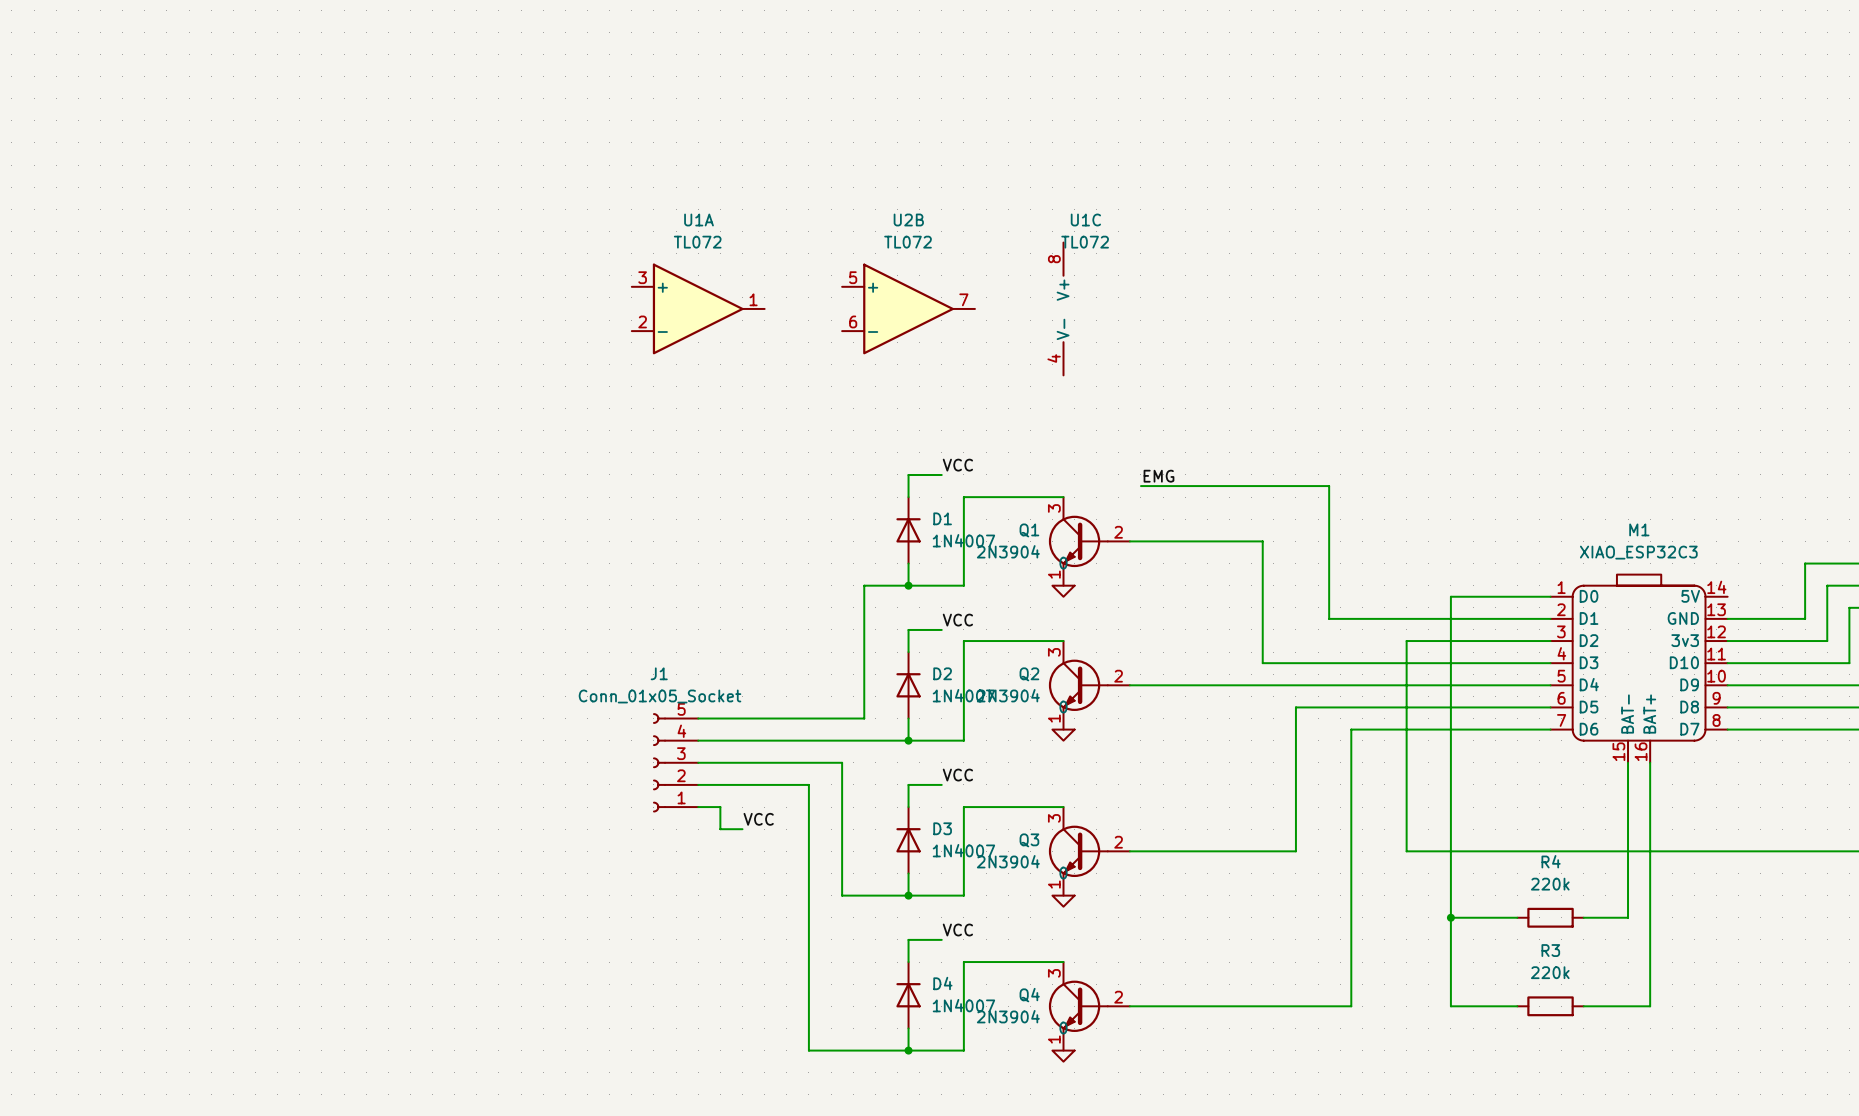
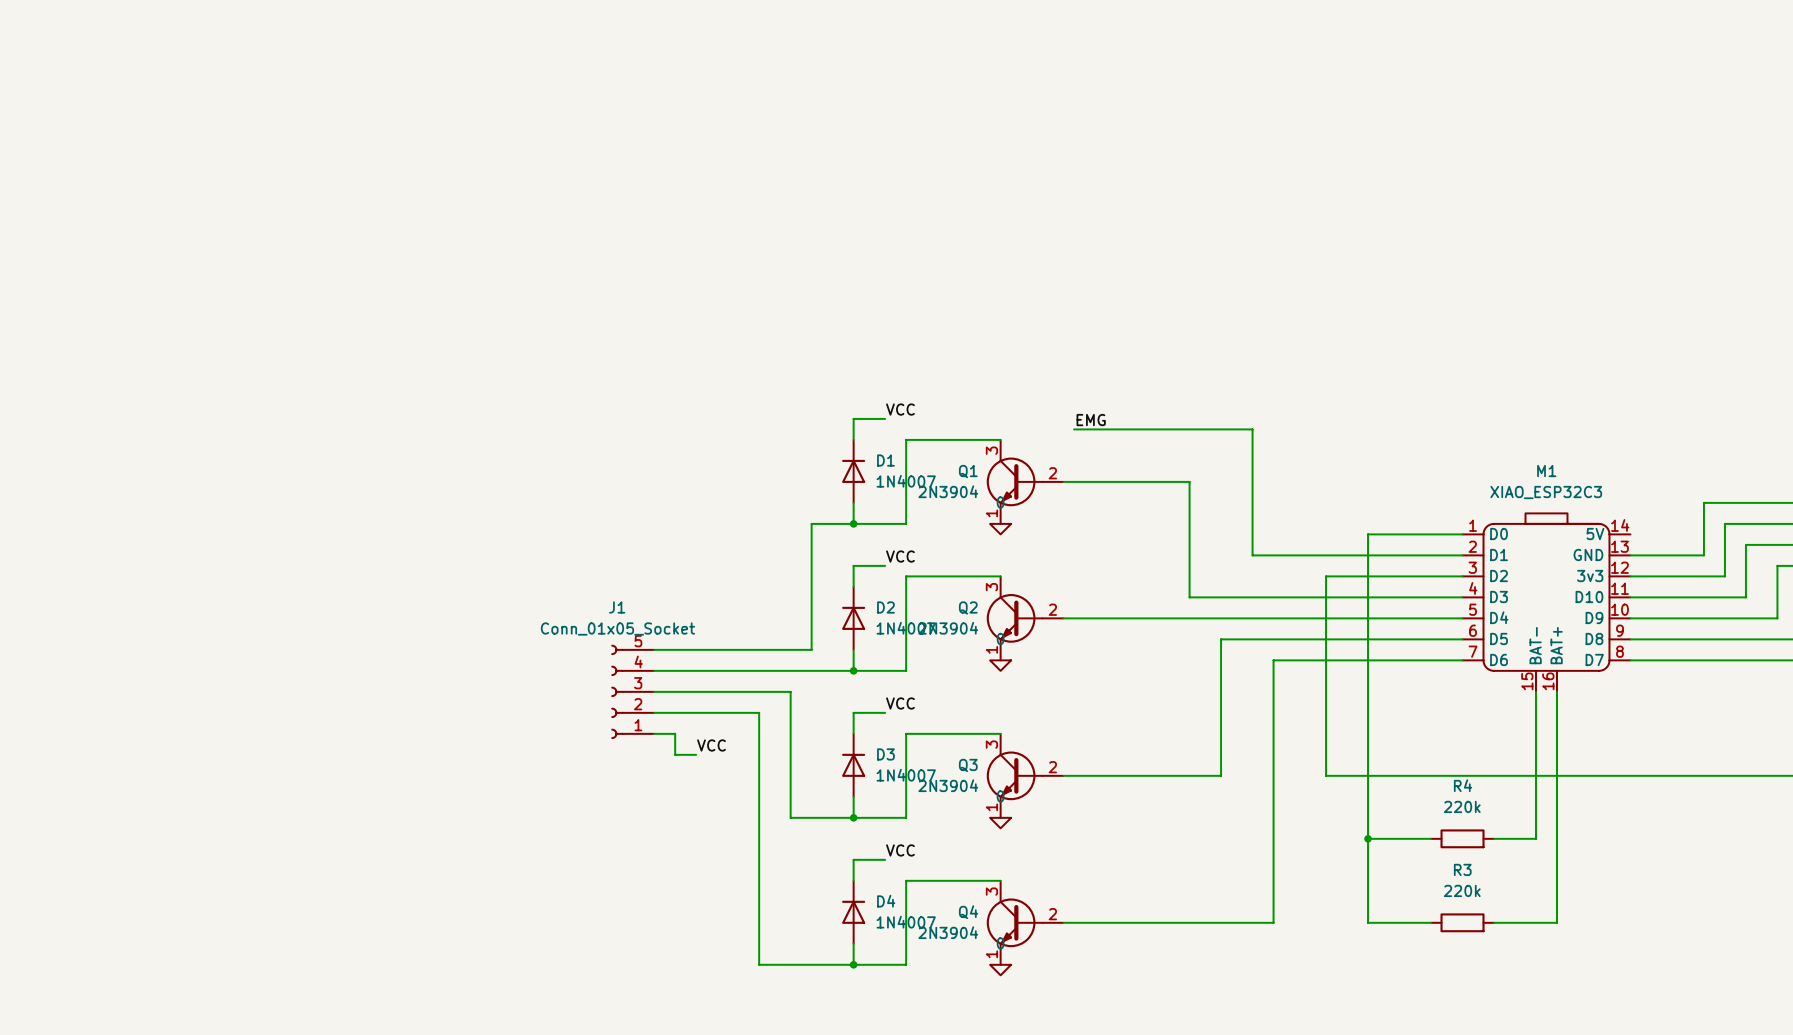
U1A: TL072 (698, 308) -> none
U2B: TL072 (908, 308) -> none
U1C: TL072 (1063, 308) -> none

